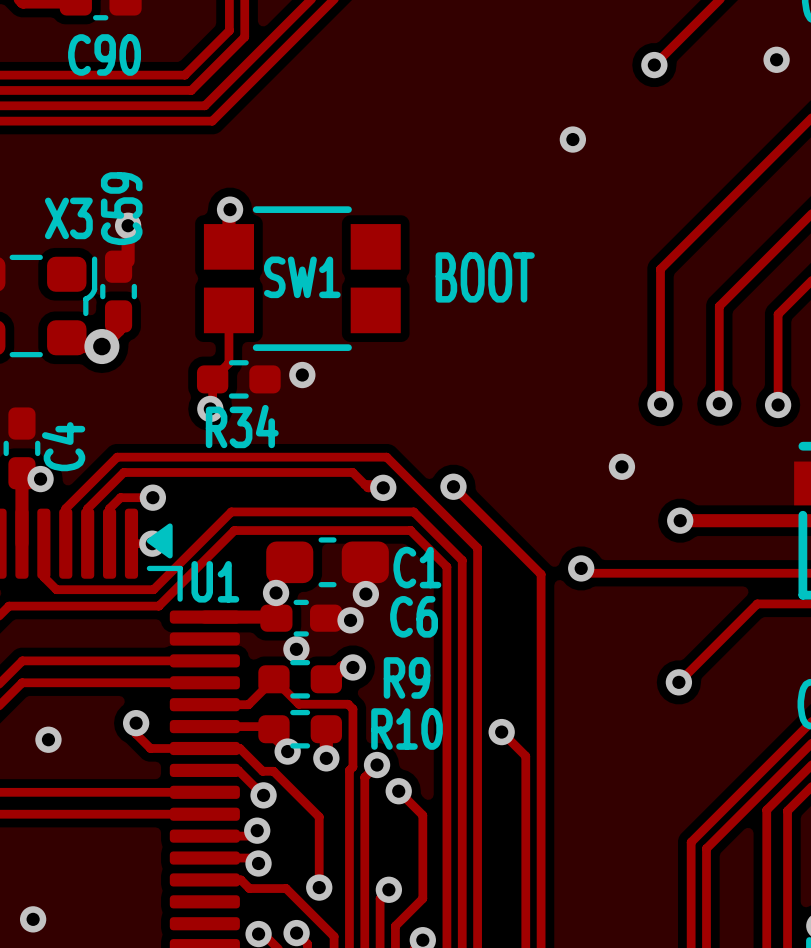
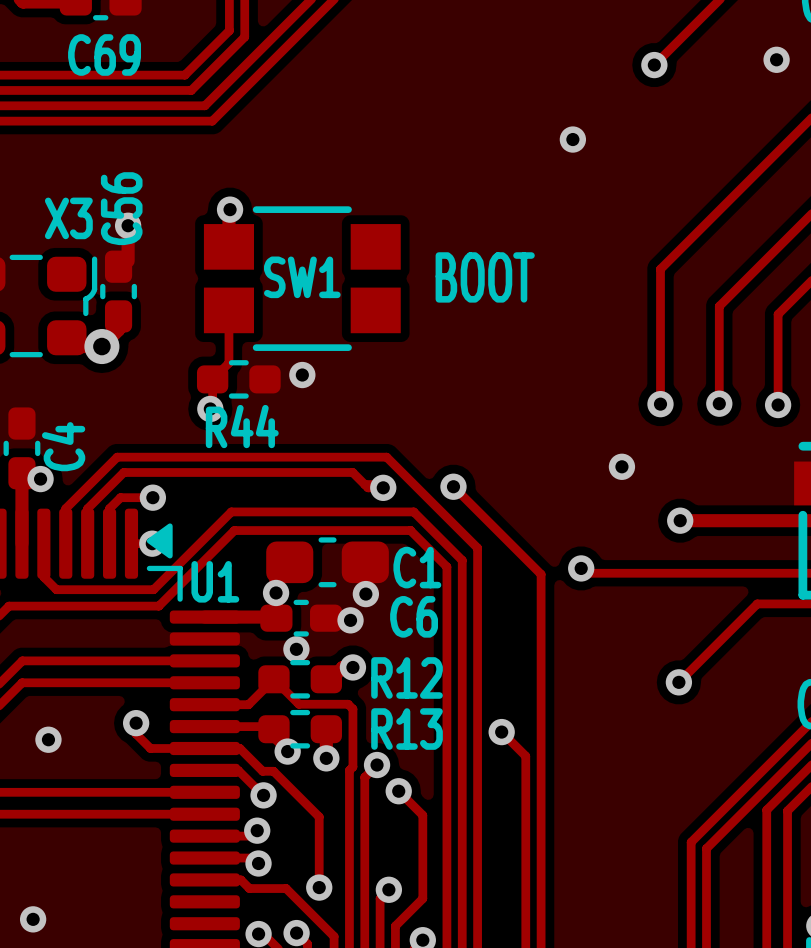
C90 name: C90 (104, 54) -> C69 (104, 54)
C59 name: C59 (121, 208) -> C56 (121, 208)
R34 name: R34 (242, 426) -> R44 (242, 426)
R9 name: R9 (407, 677) -> R12 (407, 677)
R10 name: R10 (407, 729) -> R13 (407, 729)

